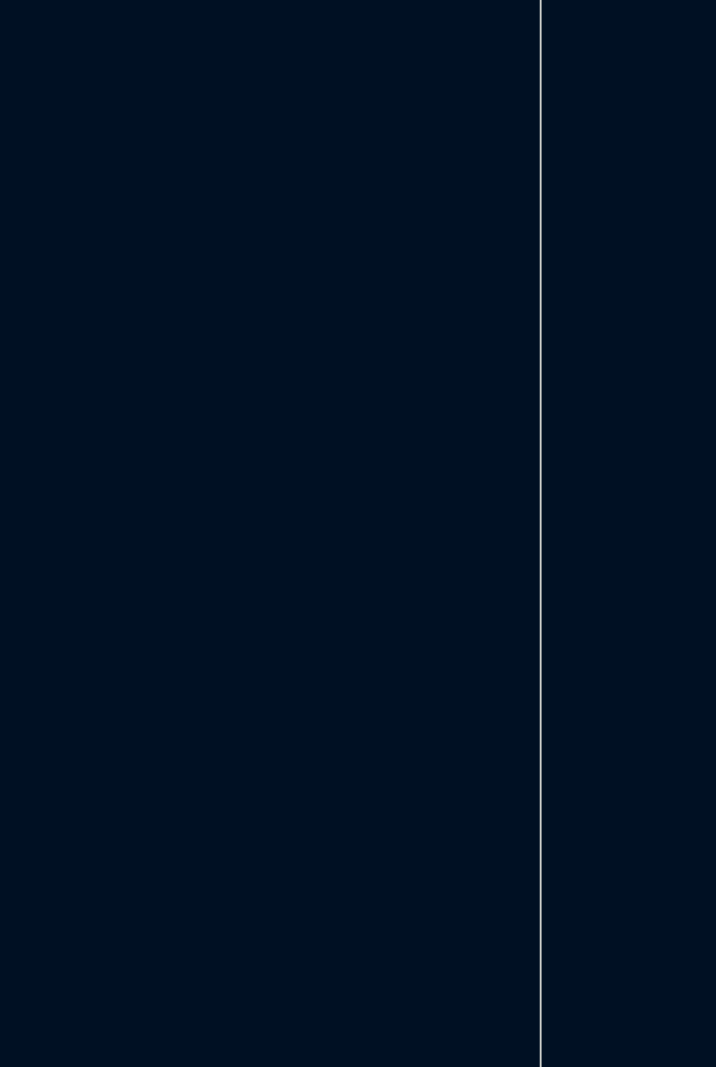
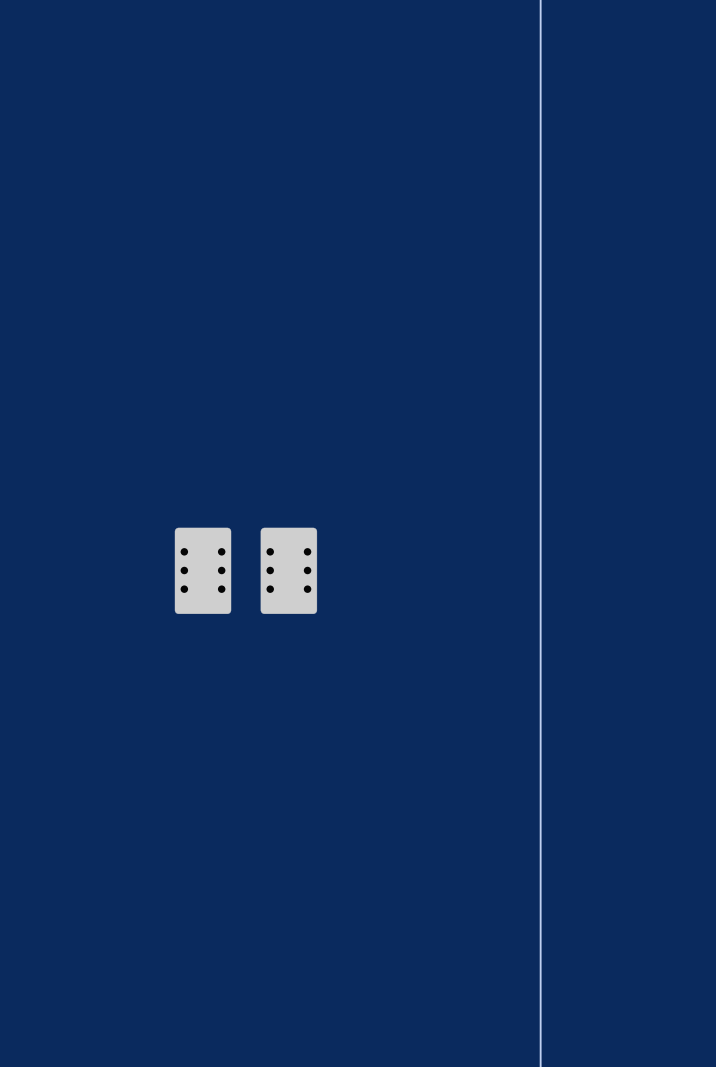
part: none -> (245, 570)

